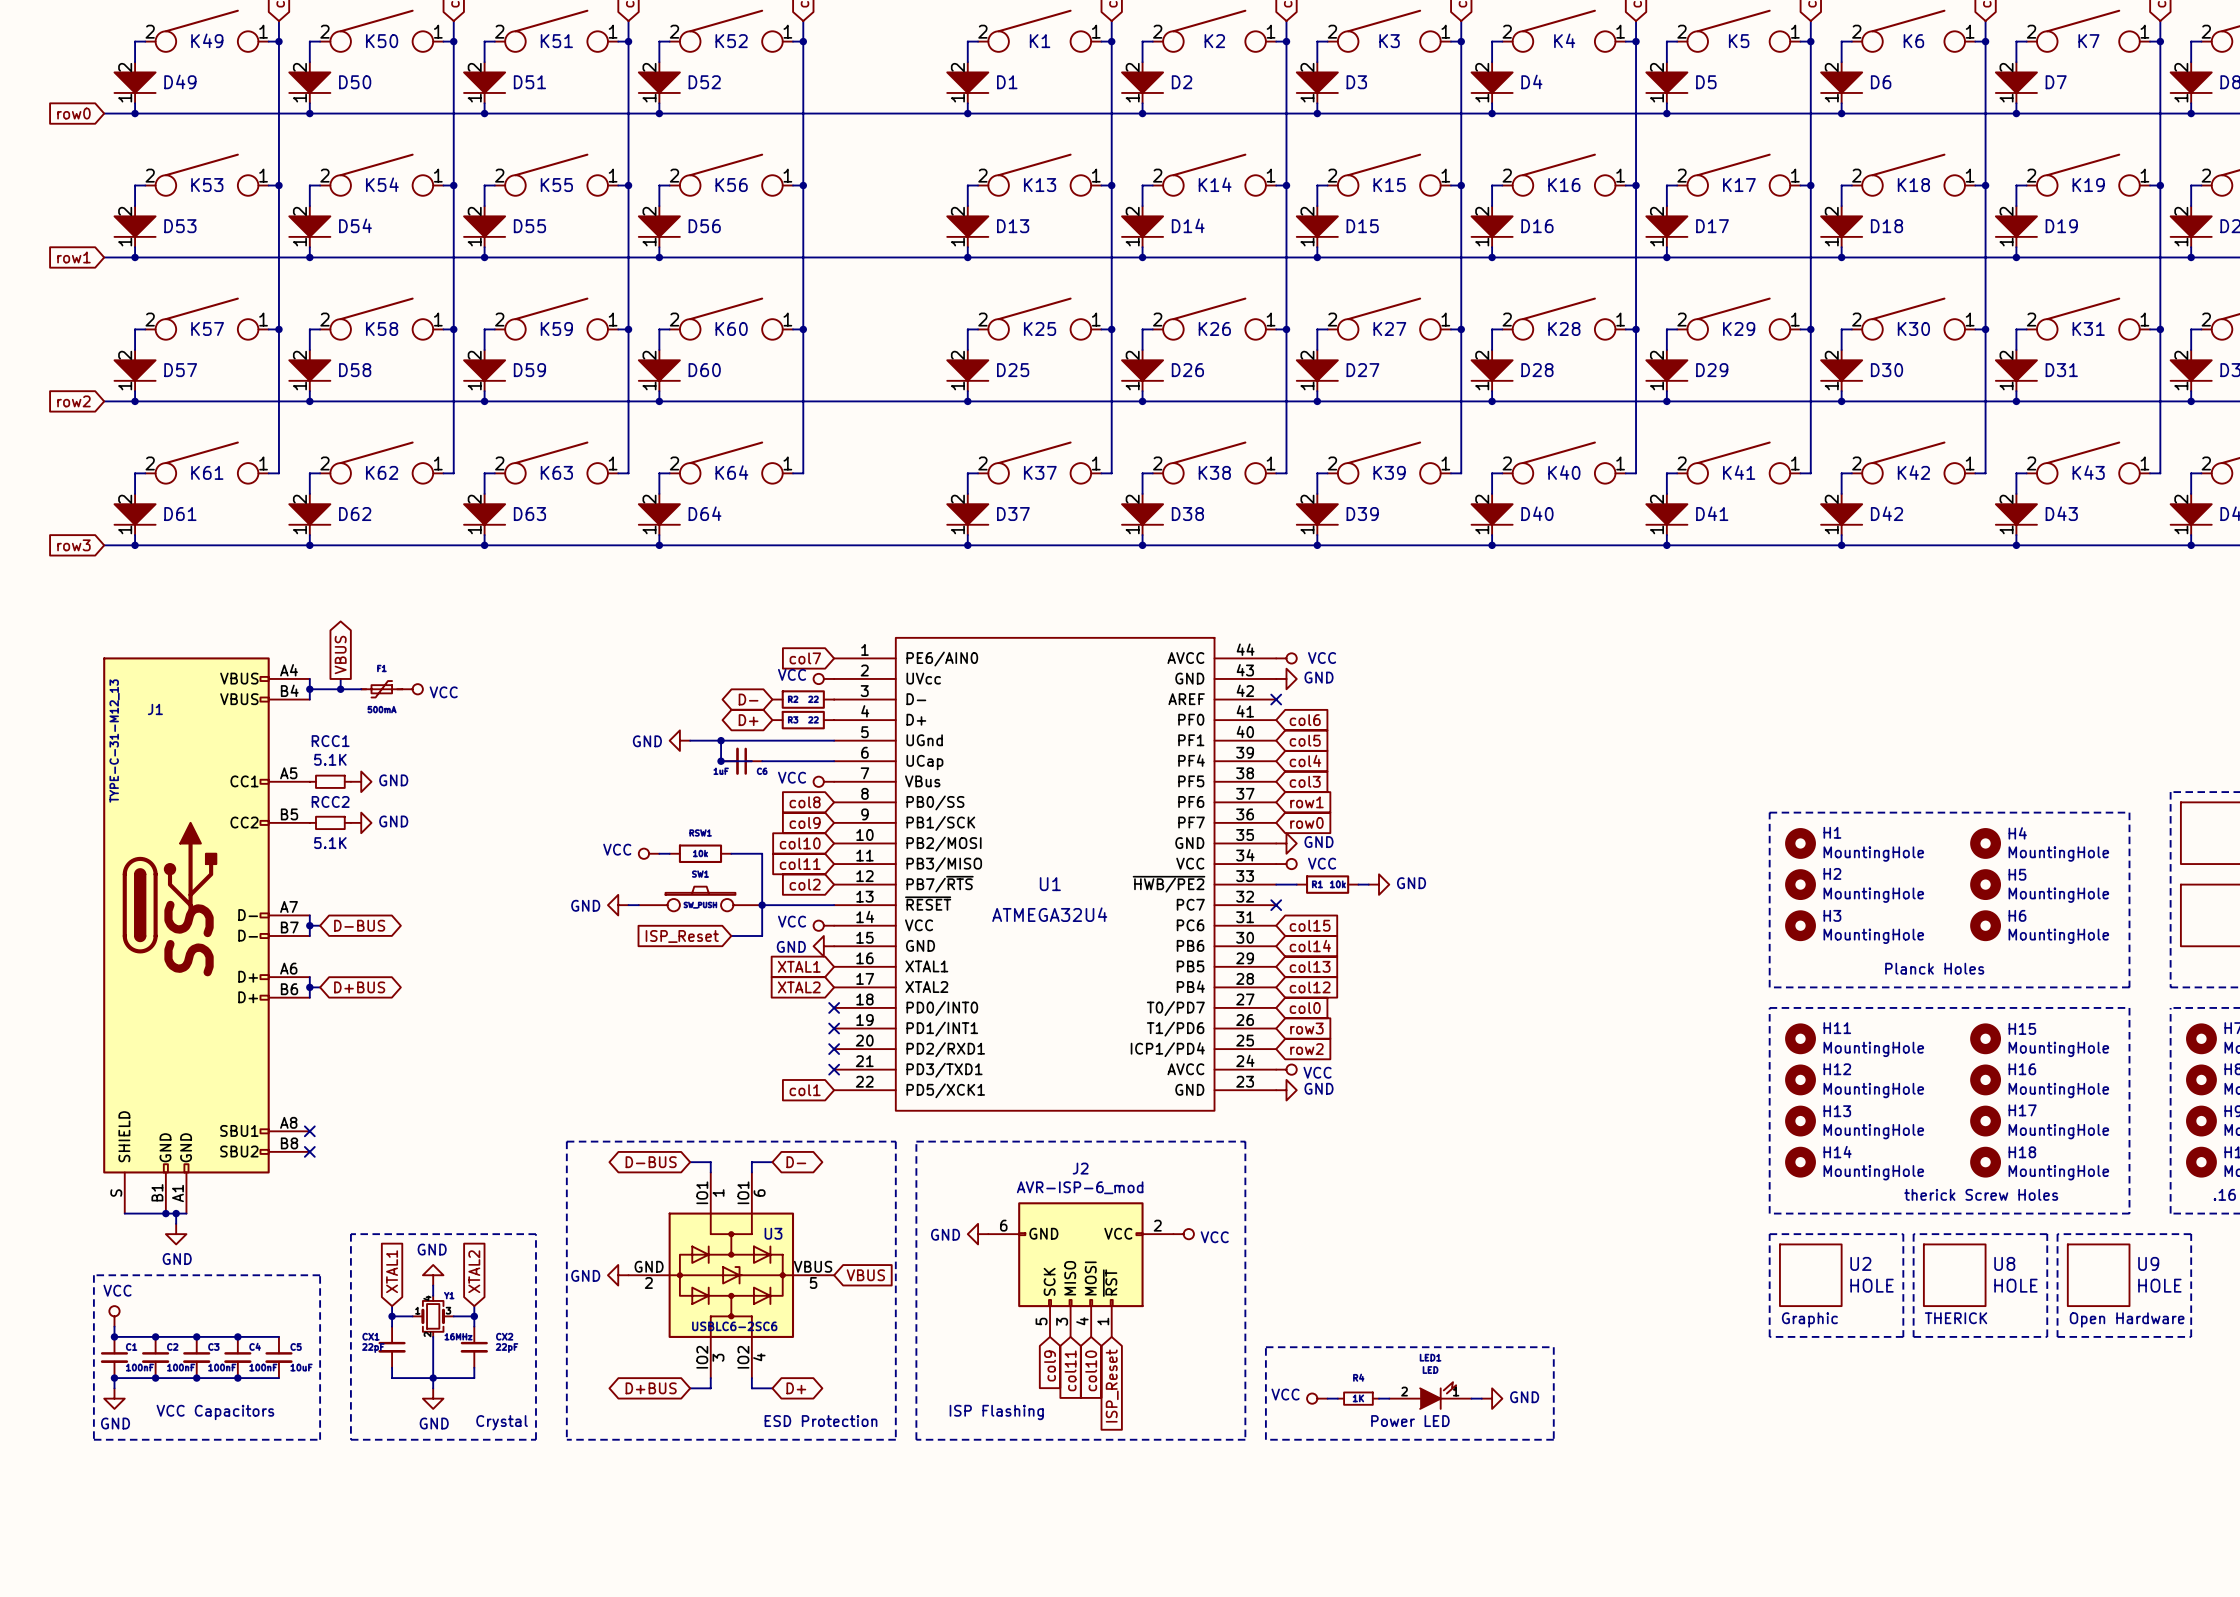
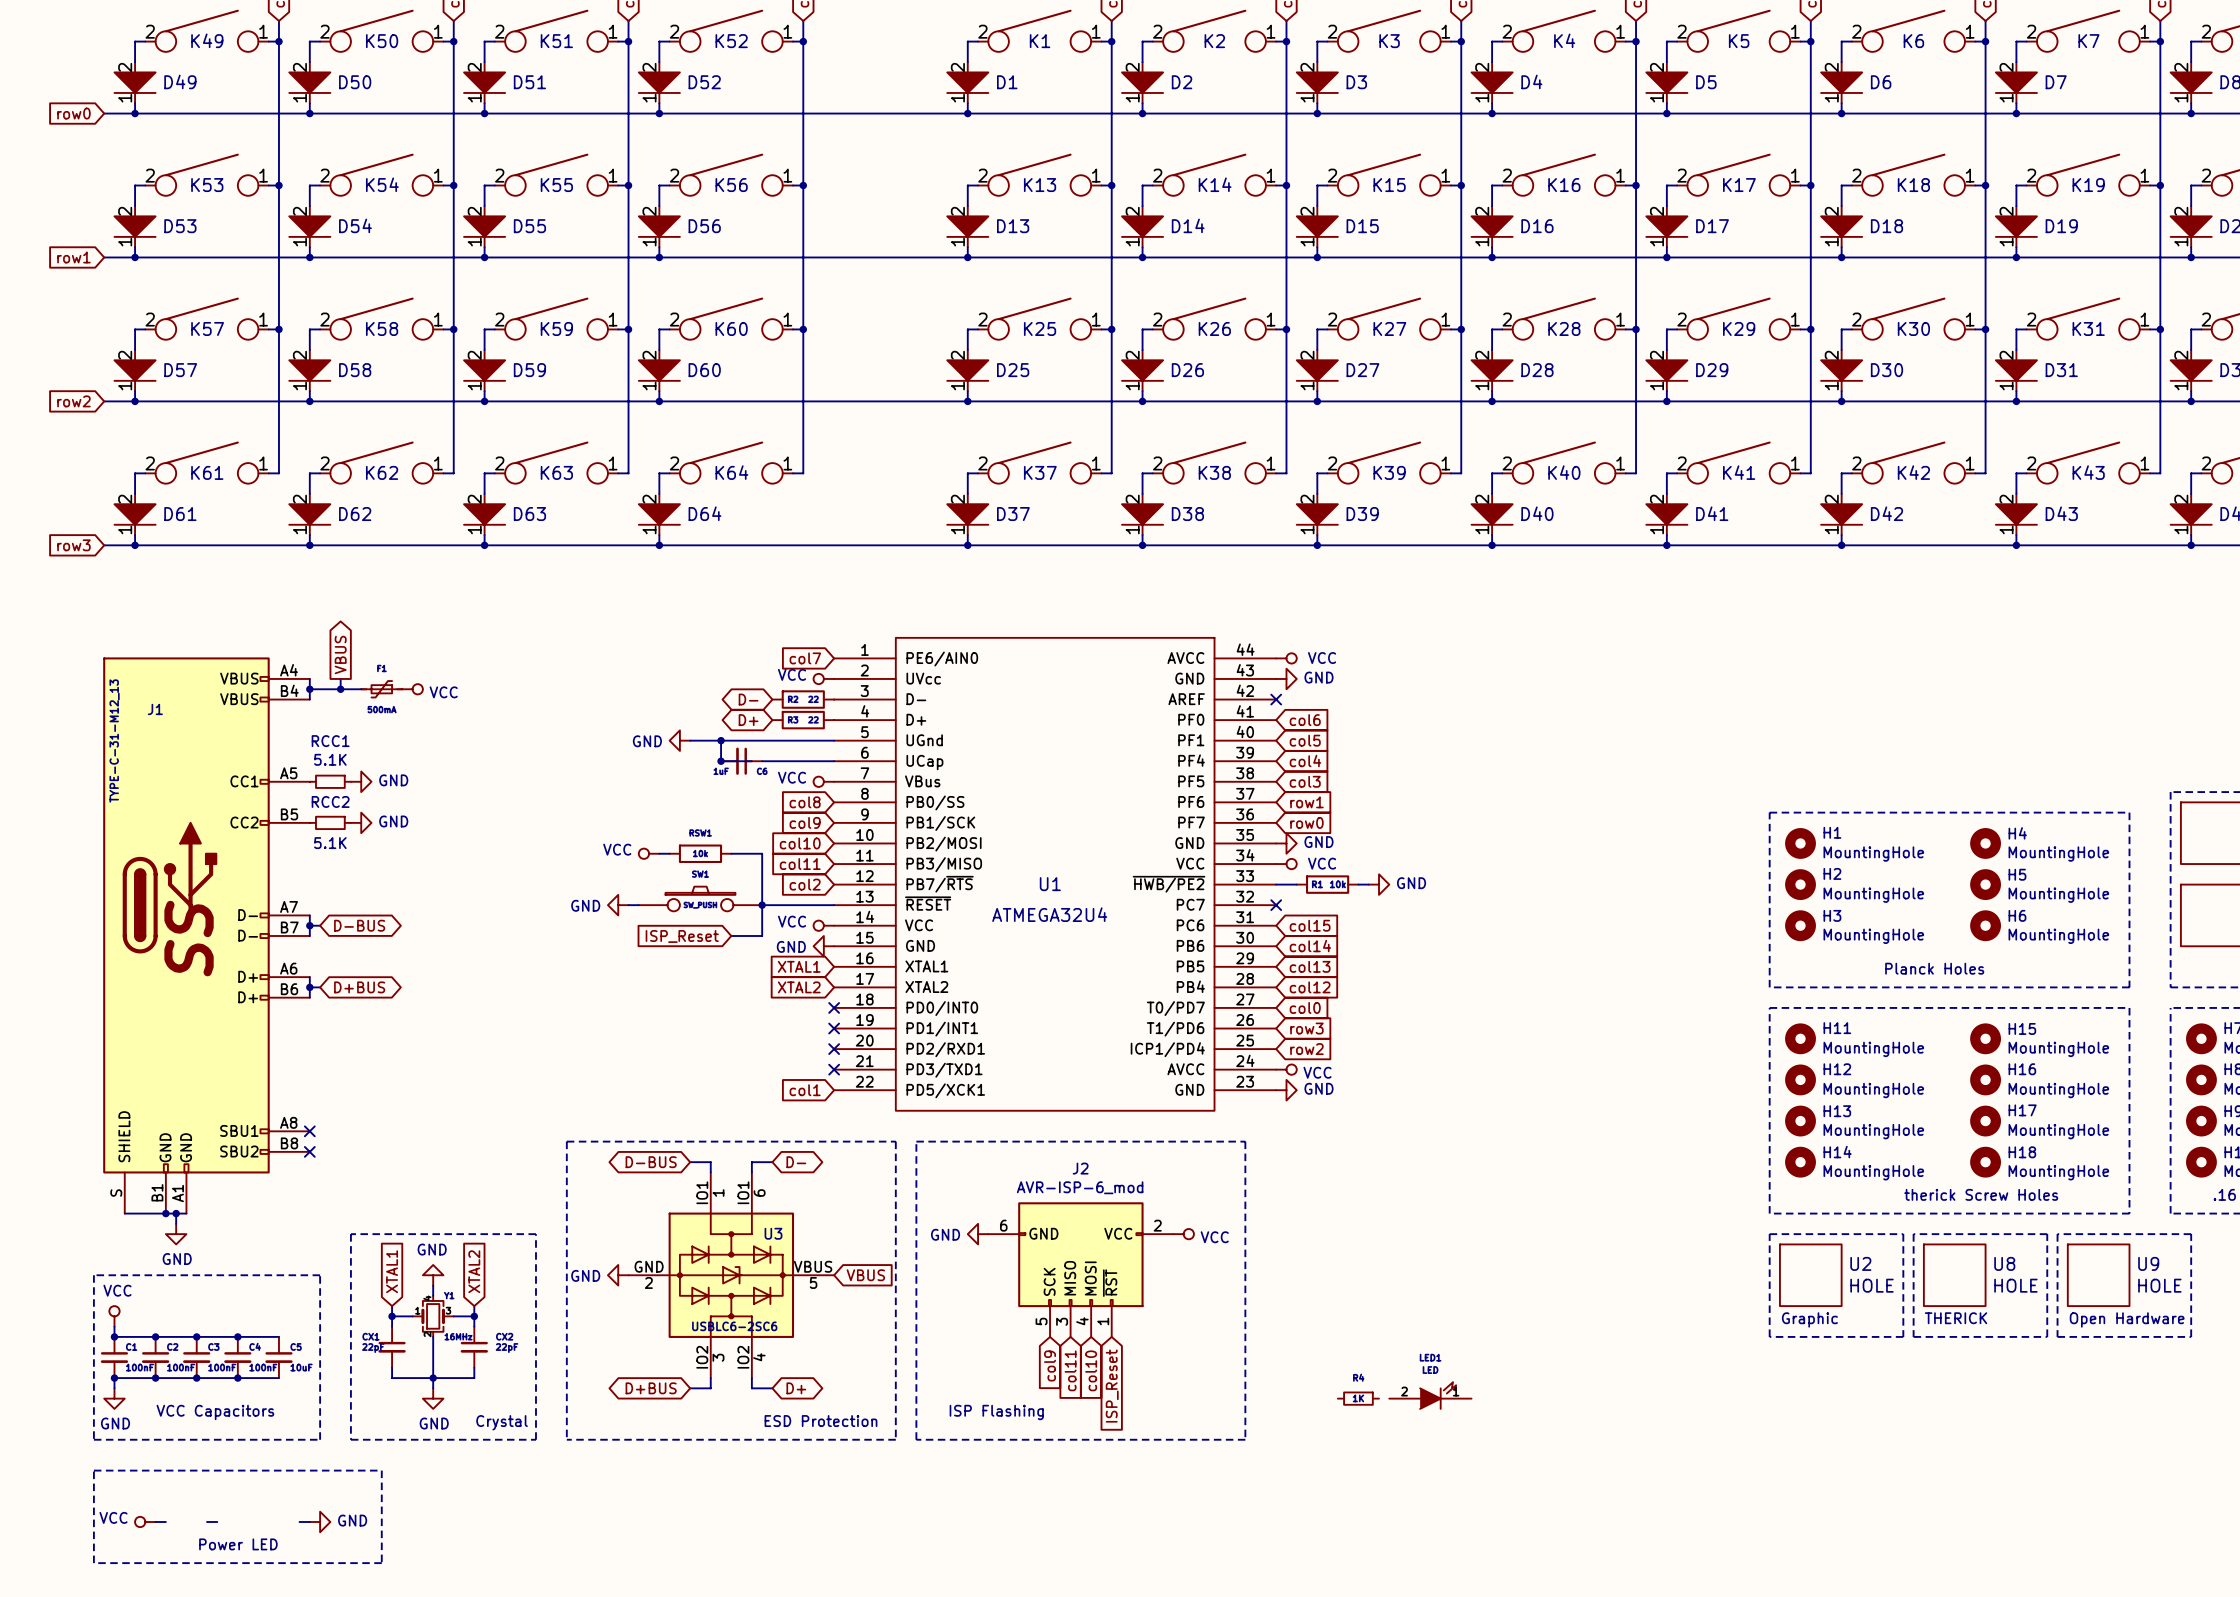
line: (1265, 1347) (1553, 1347) (1553, 1439) (1265, 1439) (1265, 1347) -> none
power symbol: VCC (1317, 1398) -> none
wire: (1327, 1398) (1337, 1398) -> none
wire: (1379, 1398) (1389, 1398) -> none
wire: (1471, 1398) (1481, 1398) -> none
power symbol: GND (1492, 1398) -> none
text: Power LED (1410, 1421) -> none
line: none -> (93, 1470) (93, 1563) (381, 1563) (381, 1470) (93, 1470)
power symbol: none -> VCC (145, 1521)
wire: none -> (155, 1521) (165, 1521)
wire: none -> (207, 1521) (217, 1521)
wire: none -> (299, 1521) (309, 1521)
power symbol: none -> GND (320, 1521)
text: none -> Power LED (238, 1544)

